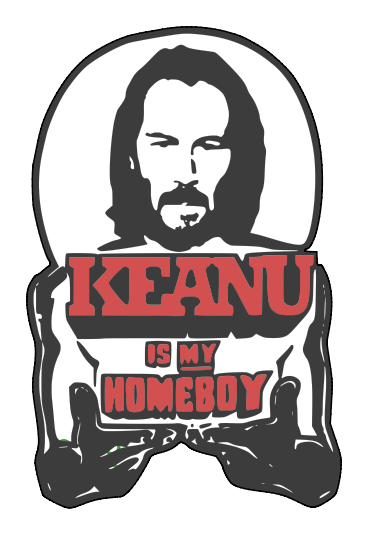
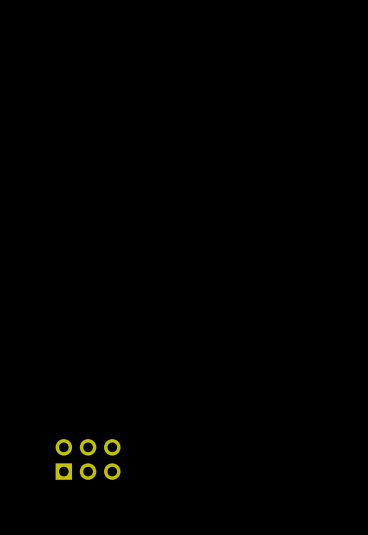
drawing: [26, 26, 342, 508] -> none
board edge: (186, 26) (129, 35) (112, 42) (91, 53) (77, 65) (64, 81) (52, 100) (42, 124) (33, 165) (32, 199) (39, 233) (50, 264) (33, 278) (28, 287) (26, 299) (28, 317) (35, 345) (32, 387) (38, 439) (35, 463) (39, 485) (43, 496) (67, 507) (97, 499) (121, 496) (134, 484) (152, 455) (169, 449) (181, 442) (193, 449) (216, 456) (228, 479) (234, 485) (280, 494) (307, 505) (316, 506) (335, 493) (341, 462) (330, 423) (332, 382) (327, 342) (331, 310) (330, 287) (323, 268) (317, 264) (316, 251) (304, 250) (310, 246) (314, 236) (321, 197) (321, 158) (315, 124) (306, 99) (294, 78) (268, 51) (234, 34) (210, 28) (186, 26) -> none

